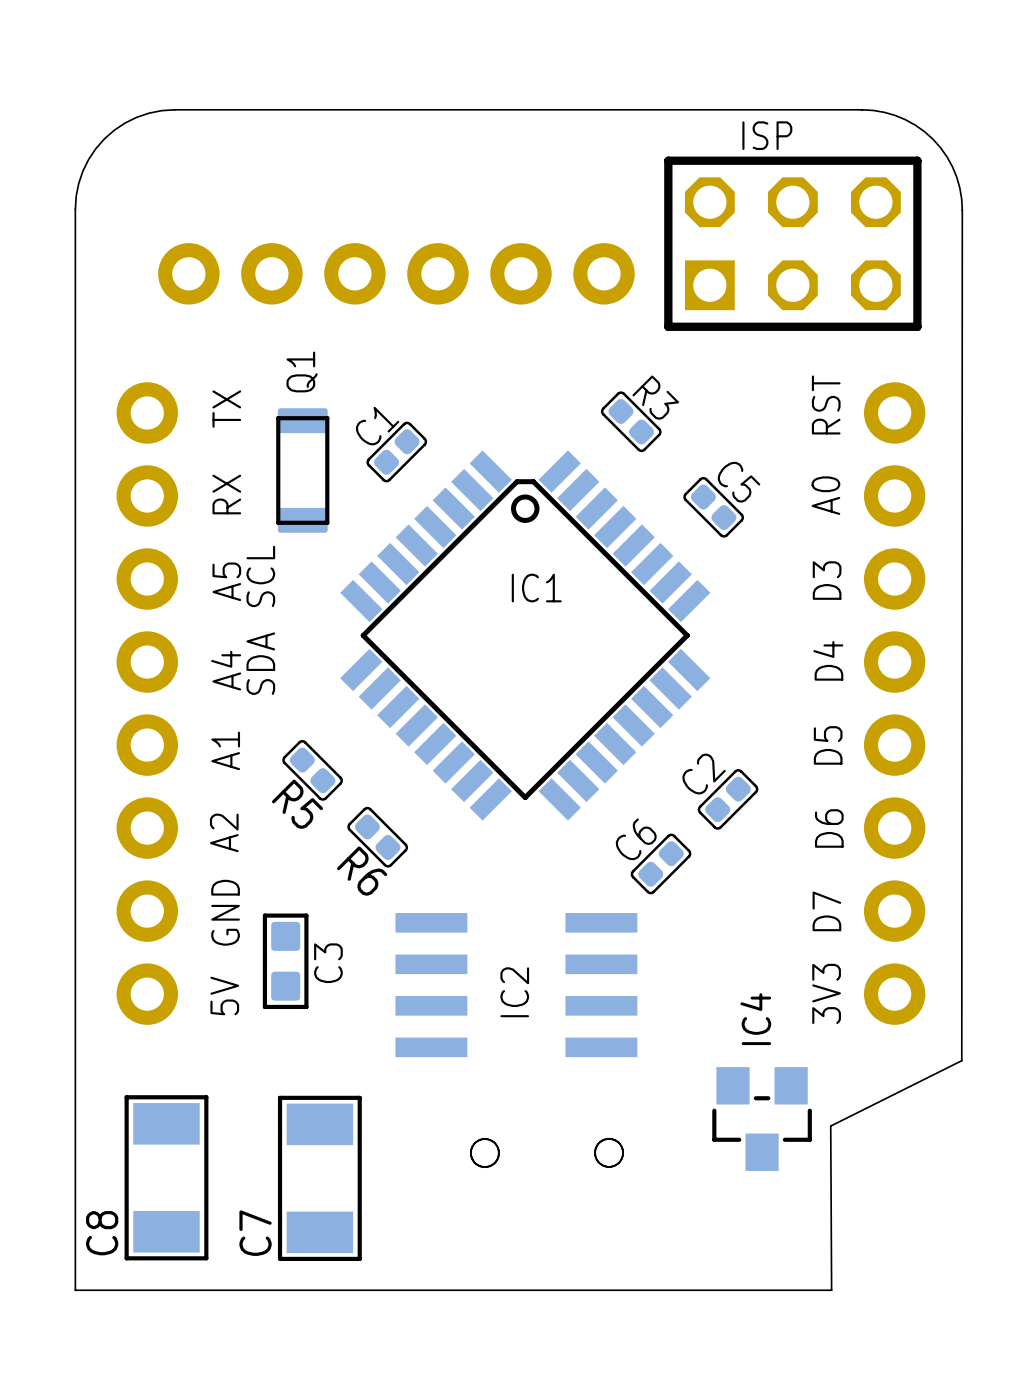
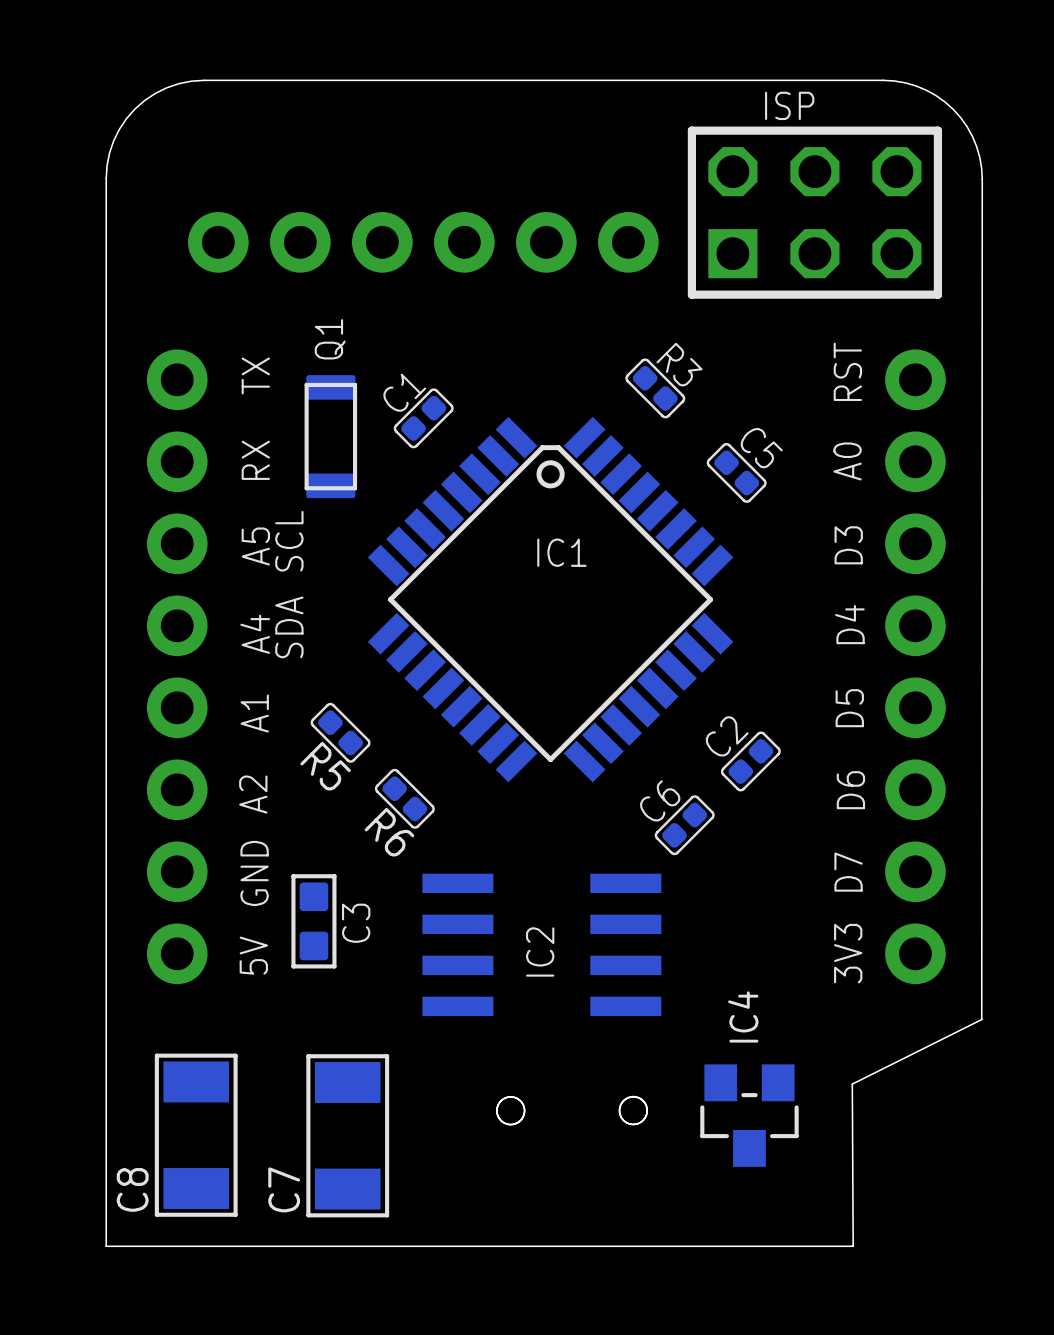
IC4 position: (762, 1119) -> (749, 1115)

